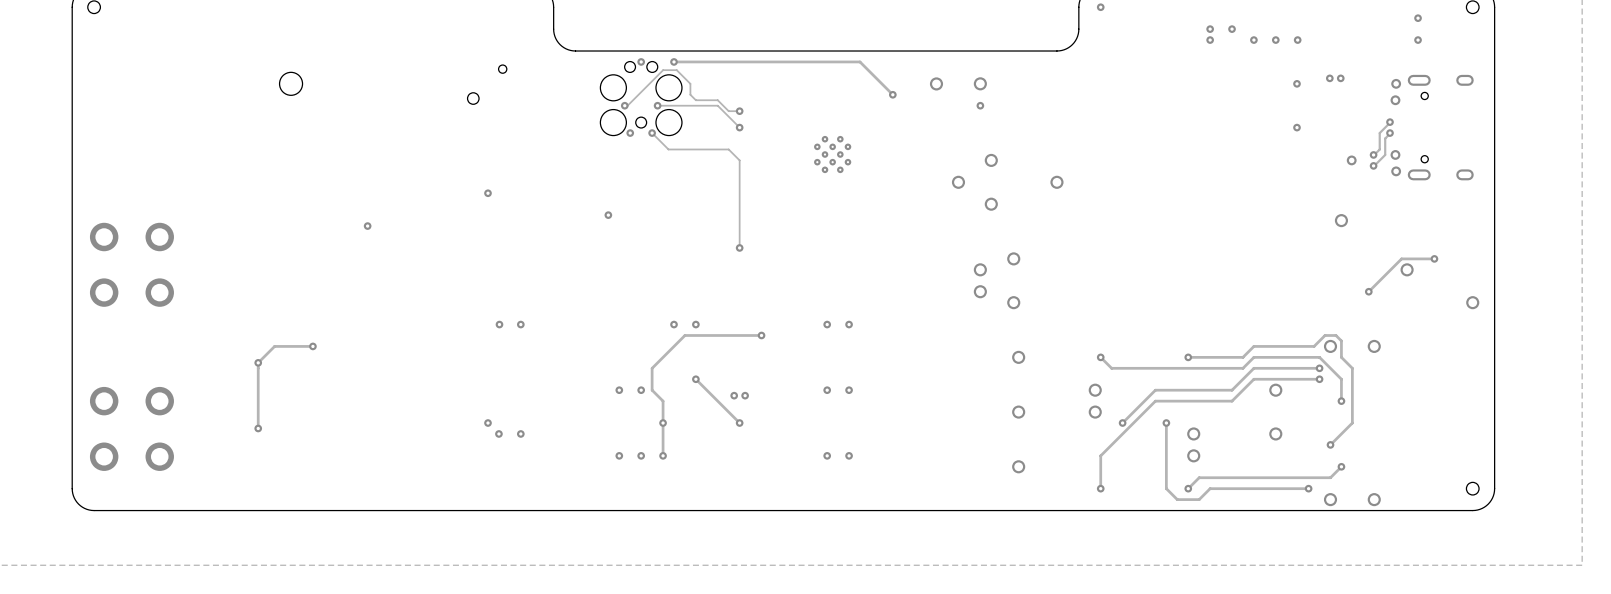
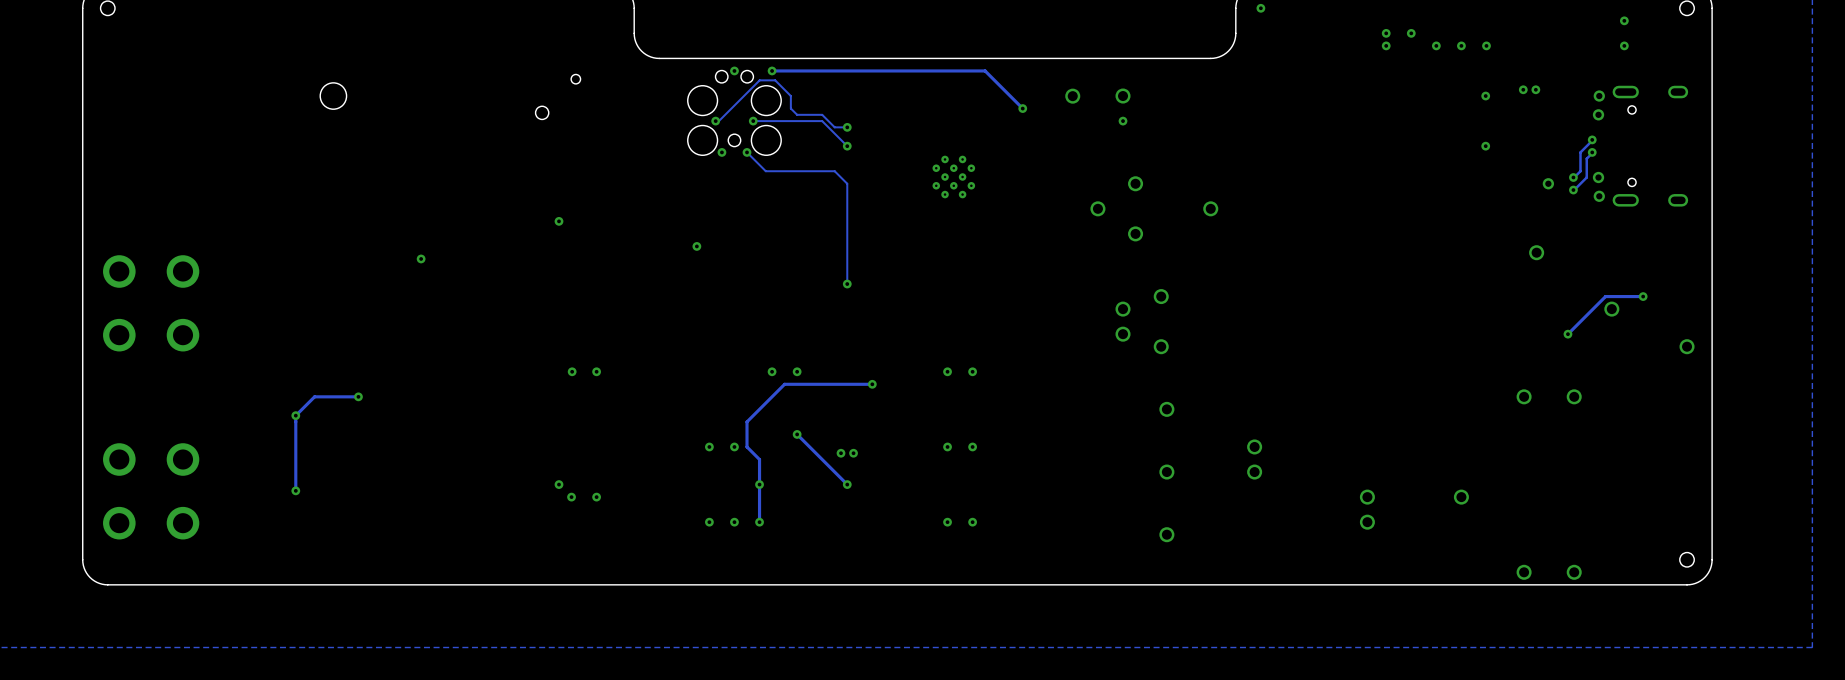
track: (1100, 357) (1111, 368) (1242, 368) (1253, 357) (1319, 357) (1341, 379) (1341, 401) -> none
via: (1100, 357) -> none
track: (1188, 357) (1242, 357) (1253, 346) (1314, 346) (1325, 335) (1335, 335) (1341, 340) (1341, 357) (1352, 368) (1352, 423) (1330, 444) -> none
via: (1188, 357) -> none
track: (1319, 368) (1253, 368) (1232, 390) (1155, 390) (1122, 423) -> none
via: (1319, 368) -> none
track: (1319, 379) (1253, 379) (1232, 401) (1155, 401) (1100, 455) (1100, 488) -> none
via: (1319, 379) -> none
via: (1275, 390) -> none
via: (1341, 401) -> none
via: (1122, 423) -> none
track: (1166, 423) (1166, 488) (1177, 499) (1199, 499) (1210, 488) (1308, 488) -> none
via: (1166, 423) -> none
via: (1330, 444) -> none
track: (1341, 466) (1330, 477) (1199, 477) (1188, 488) -> none
via: (1341, 466) -> none
via: (1100, 488) -> none
via: (1188, 488) -> none
via: (1308, 488) -> none

